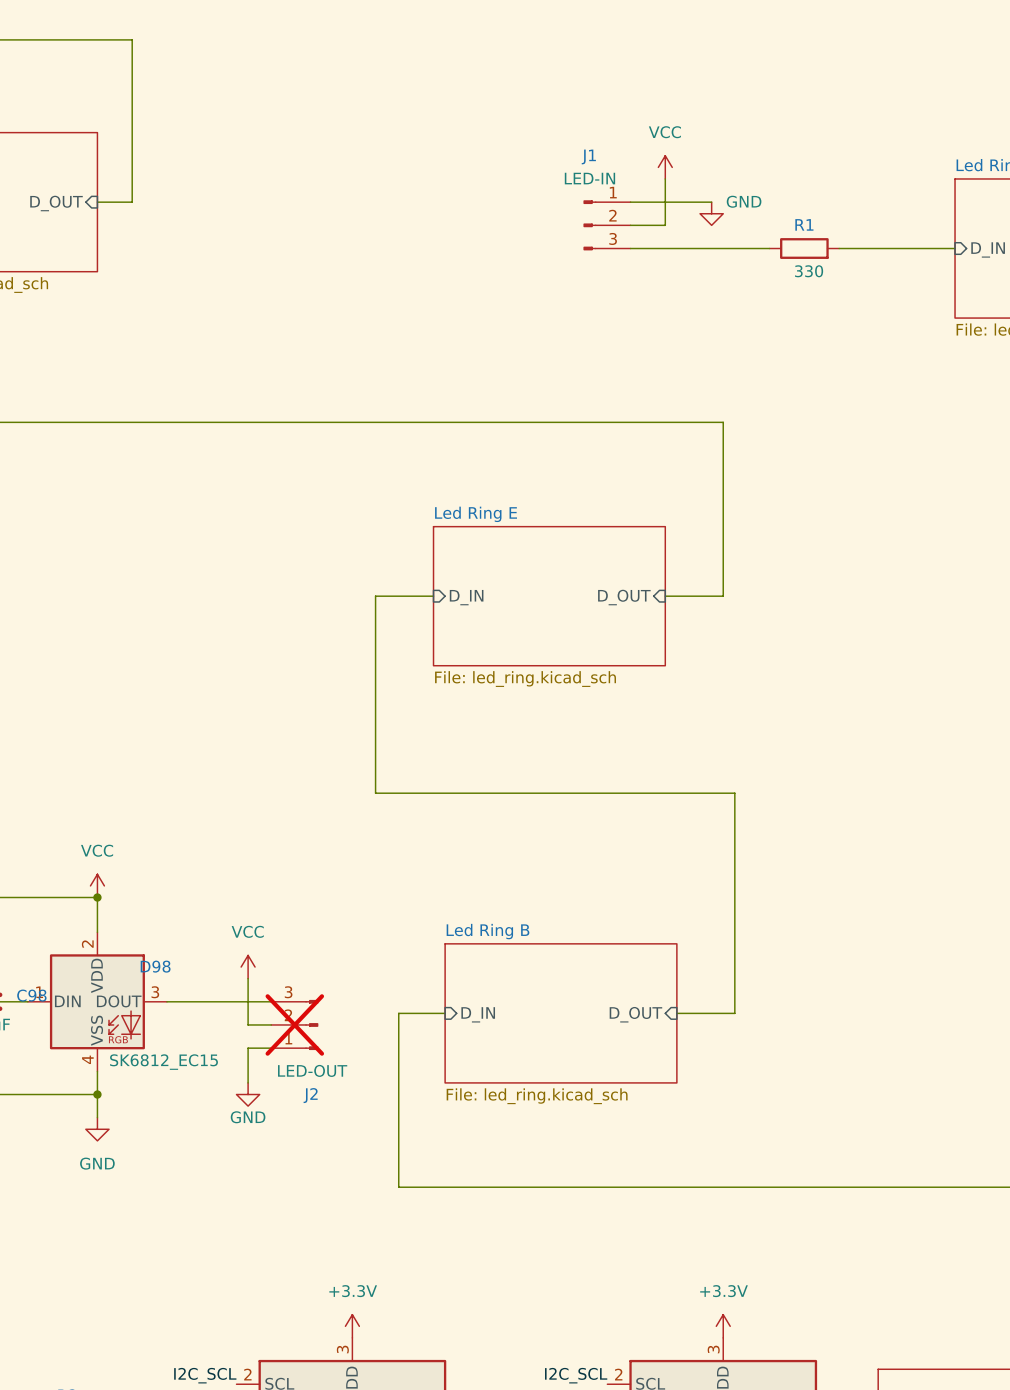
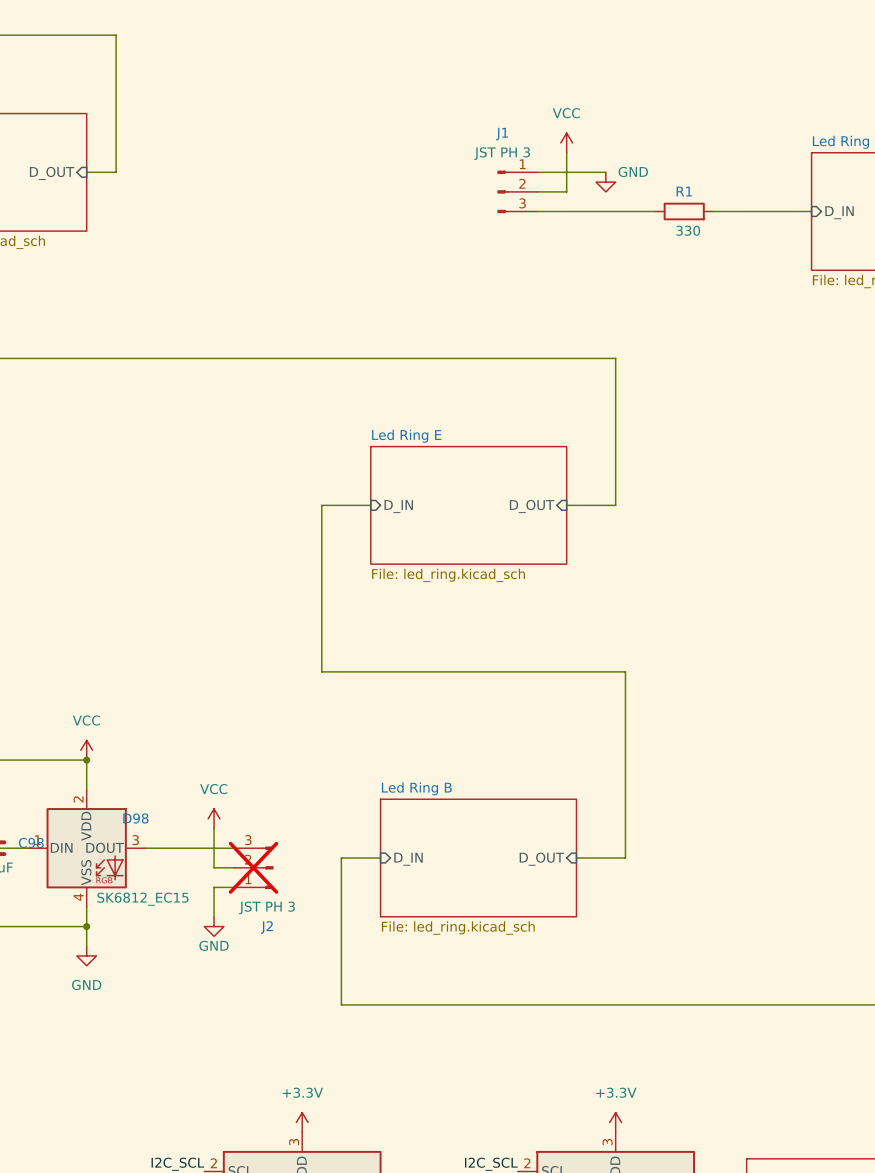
J1 value: LED-IN (589, 178) -> JST PH 3 (502, 153)
J2 value: LED-OUT (312, 1070) -> JST PH 3 (267, 907)

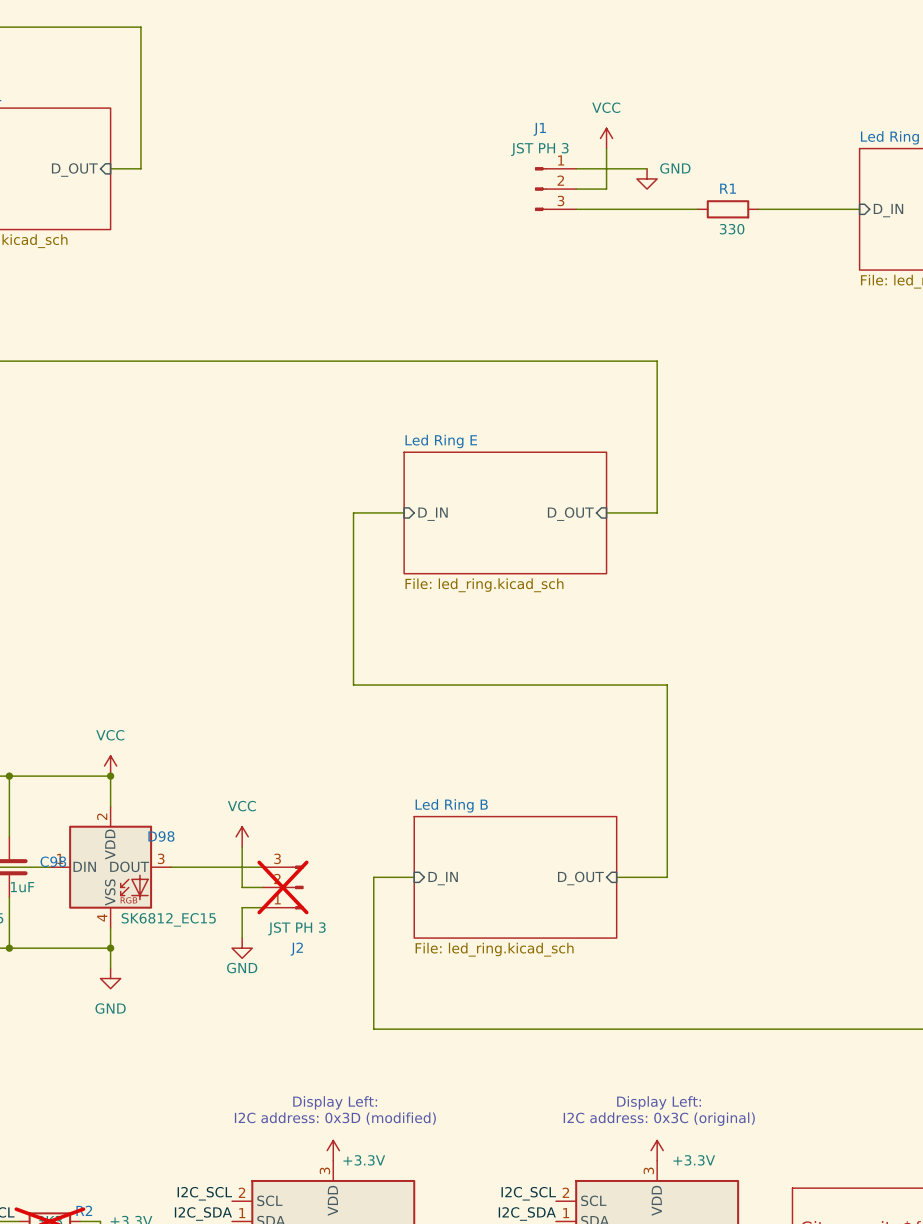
text: none -> Display Left: (335, 1102)
text: none -> Display Left: (659, 1102)
text: none -> I2C address: 0x3D (modified) (335, 1118)
power symbol text position: +3.3V (302, 1092) -> +3.3V (364, 1160)
power symbol text position: +3.3V (616, 1092) -> +3.3V (694, 1160)
text: none -> I2C address: 0x3C (original) (659, 1119)

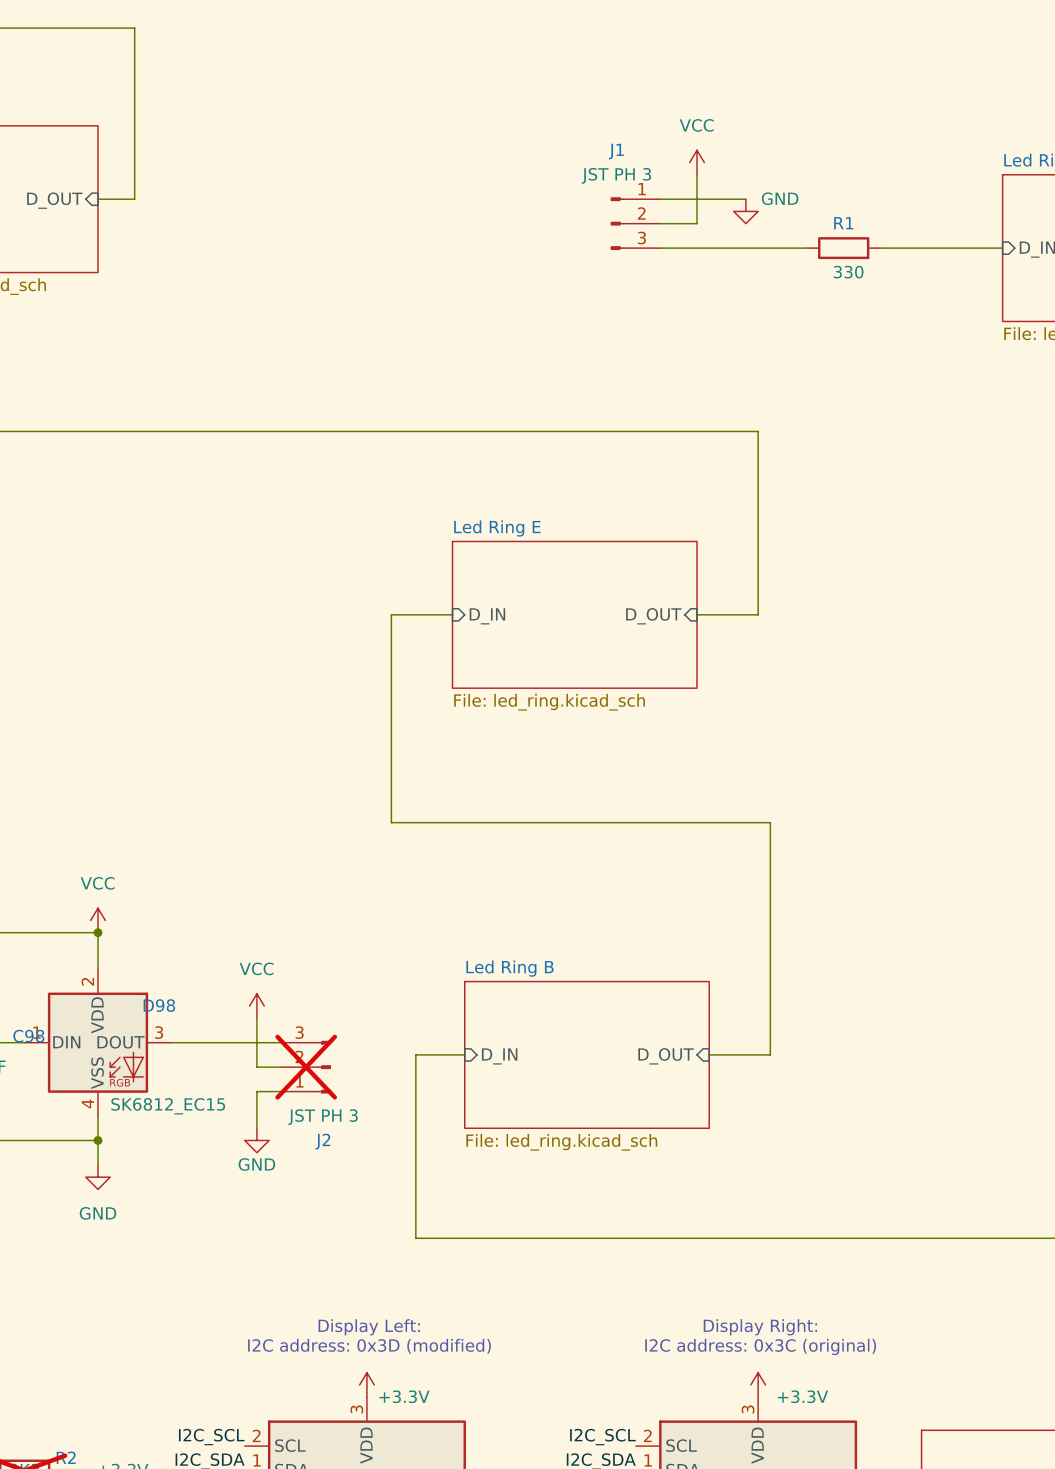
text: Display Left: (659, 1102) -> Display Right: (760, 1327)

